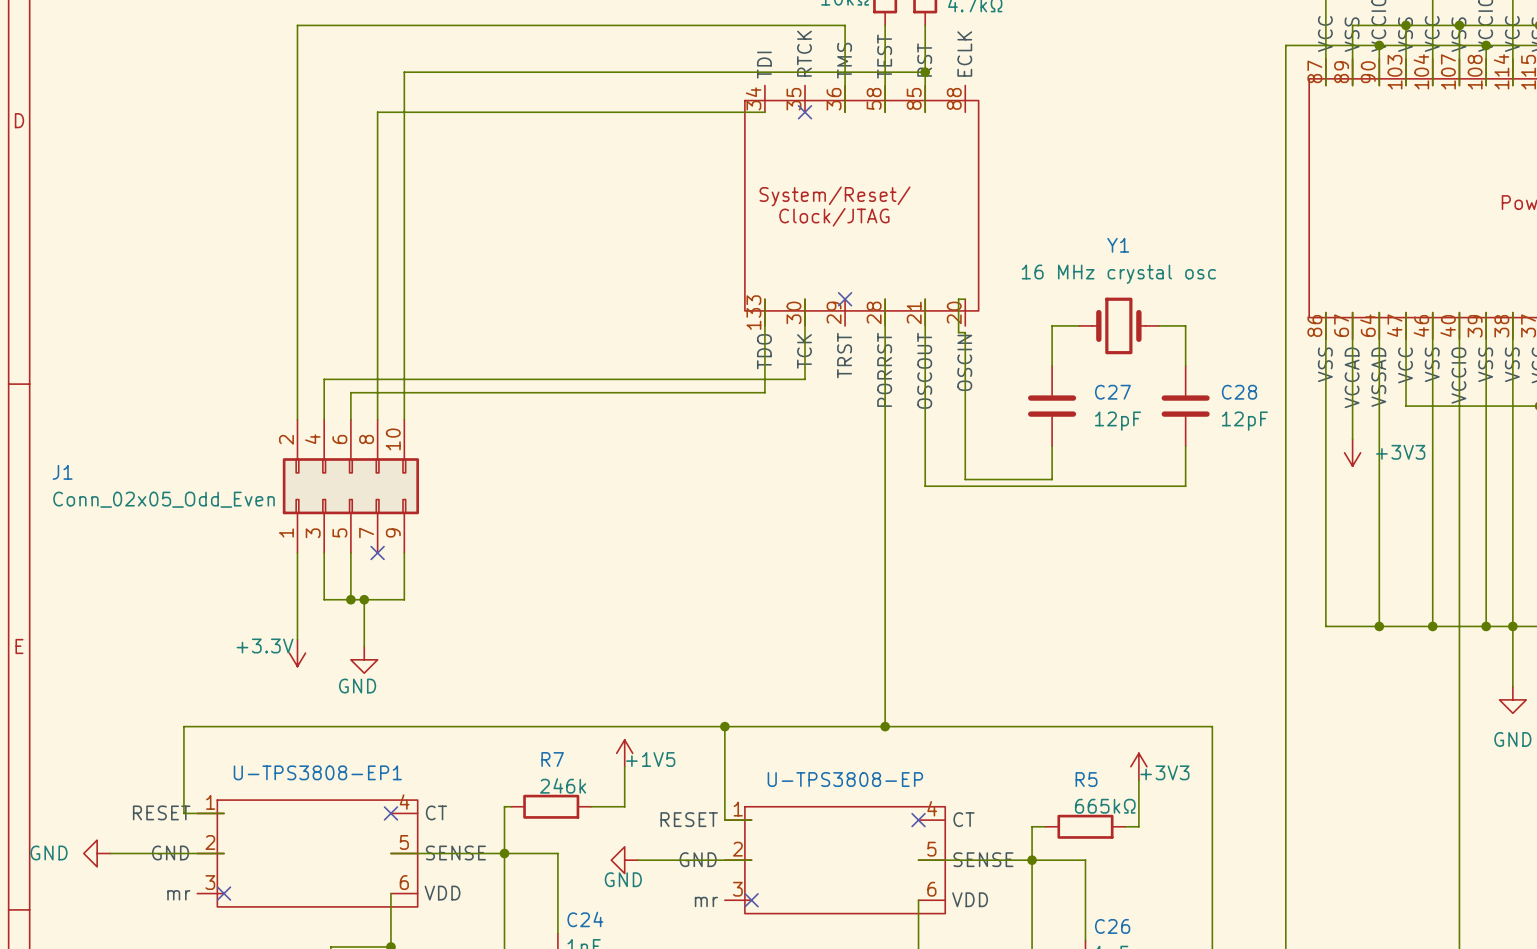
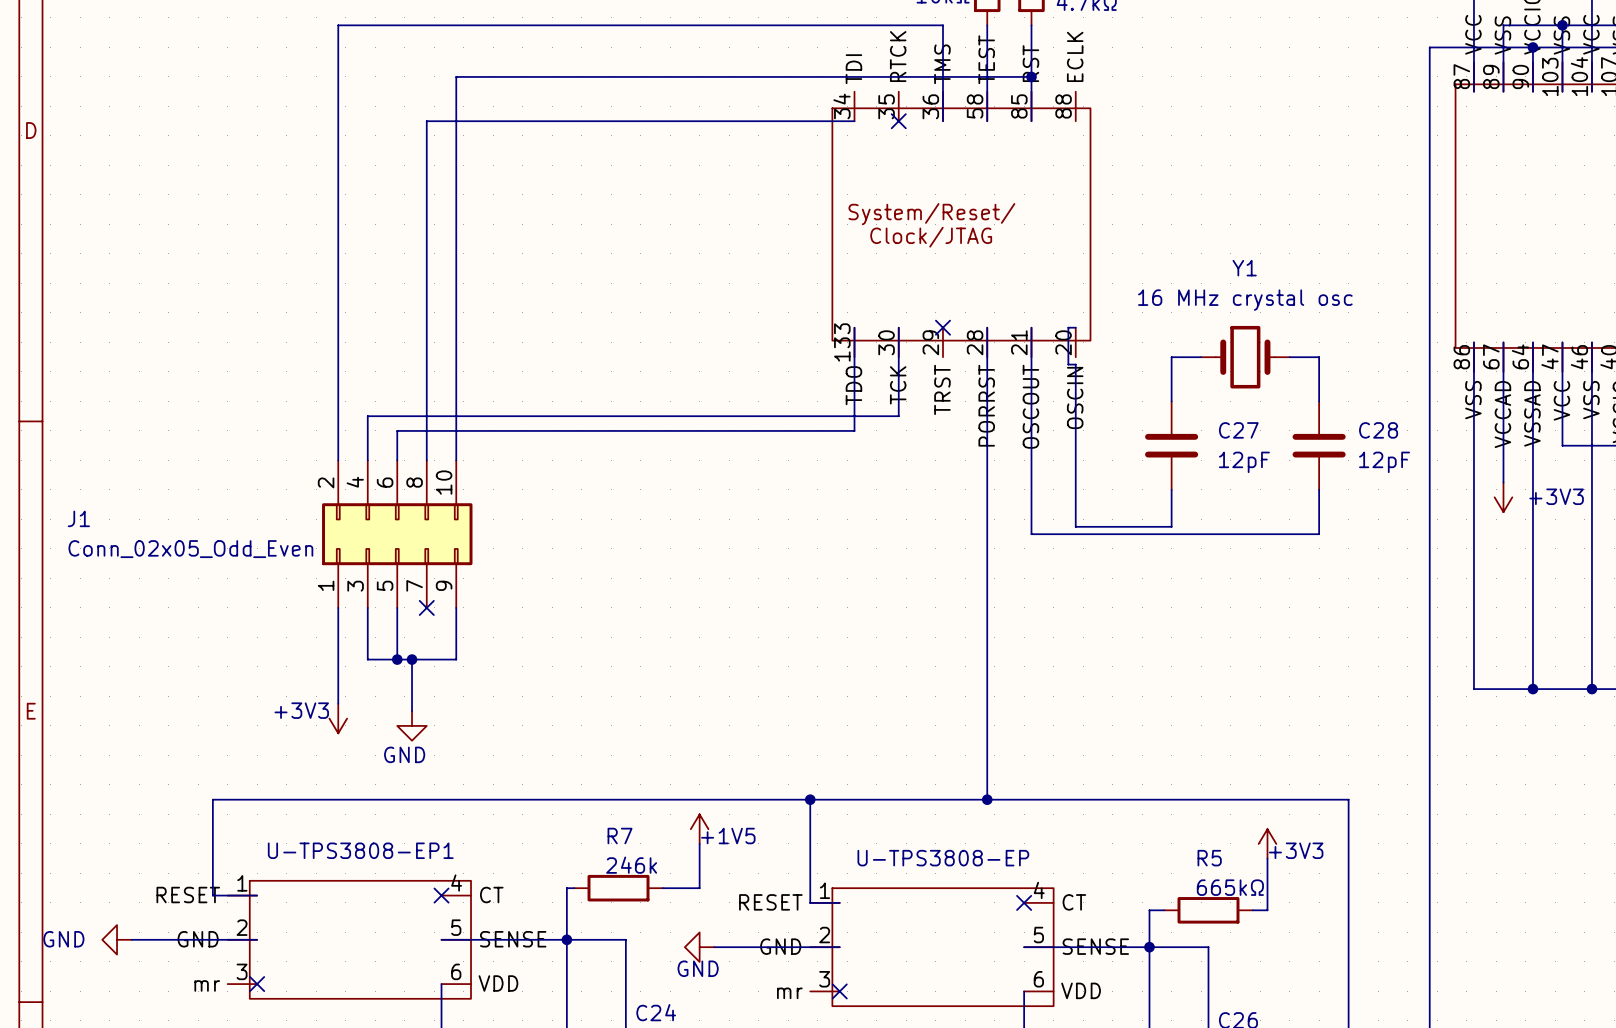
power symbol: +3.3V (297, 653) -> +3V3 (338, 718)

